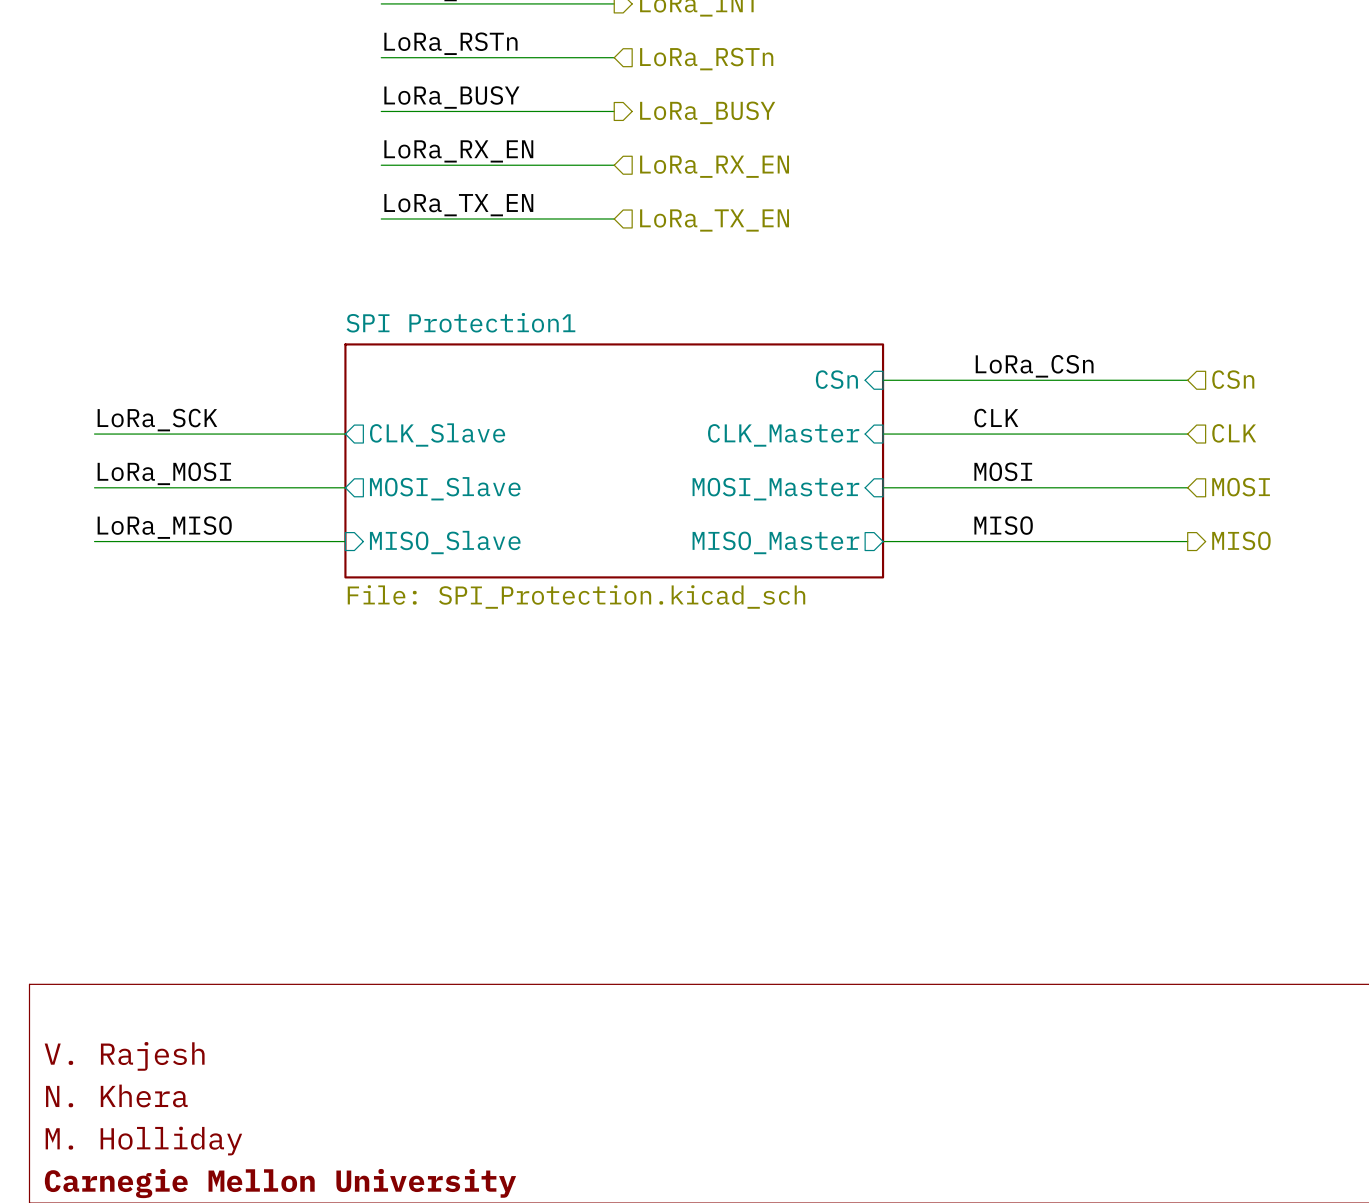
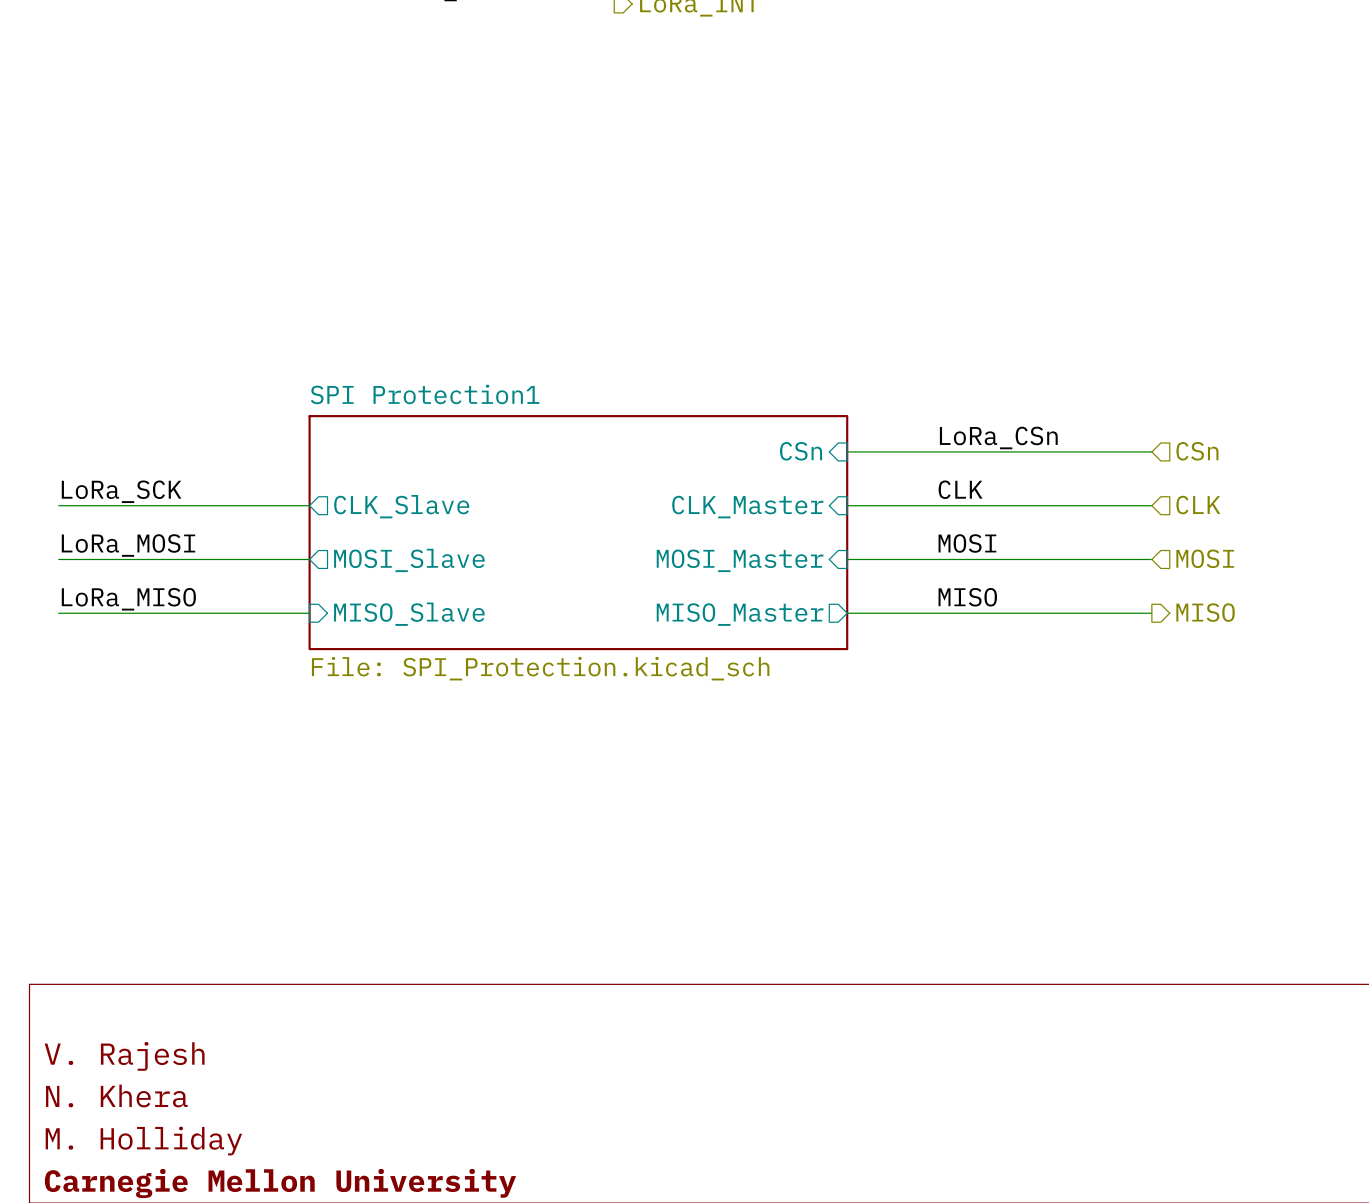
wire: (381, 3) (614, 3) -> none
label: LoRa_RSTn (450, 43) -> none
wire: (381, 57) (614, 57) -> none
hierarchical label: LoRa_RSTn (706, 59) -> none
label: LoRa_BUSY (451, 97) -> none
wire: (381, 111) (614, 111) -> none
hierarchical label: LoRa_BUSY (707, 112) -> none
label: LoRa_RX_EN (458, 151) -> none
wire: (381, 165) (614, 165) -> none
hierarchical label: LoRa_RX_EN (714, 166) -> none
label: LoRa_TX_EN (458, 205) -> none
wire: (381, 218) (614, 218) -> none
hierarchical label: LoRa_TX_EN (714, 220) -> none
label position: LoRa_CSn (1034, 366) -> LoRa_CSn (998, 437)
sheet pin position: CSn (836, 379) -> CSn (801, 451)
hierarchical label position: CSn (1233, 379) -> CSn (1197, 451)
wire: (883, 380) (1187, 380) -> (847, 451) (1151, 451)
label position: CLK (996, 418) -> CLK (960, 489)
label position: LoRa_SCK (157, 420) -> LoRa_SCK (121, 491)
hierarchical label position: CLK (1234, 433) -> CLK (1198, 505)
wire: (94, 434) (345, 434) -> (58, 505) (309, 505)
wire: (883, 434) (1187, 434) -> (847, 505) (1151, 505)
sheet pin position: CLK_Slave (437, 435) -> CLK_Slave (401, 506)
sheet pin position: CLK_Master (783, 435) -> CLK_Master (747, 507)
sheet SPI Protection1 position: (614, 460) -> (578, 532)
label position: MOSI (1003, 471) -> MOSI (967, 543)
label position: LoRa_MOSI (164, 473) -> LoRa_MOSI (128, 545)
wire: (94, 487) (345, 487) -> (58, 559) (309, 559)
wire: (883, 487) (1187, 487) -> (847, 559) (1151, 559)
hierarchical label position: MOSI (1241, 487) -> MOSI (1205, 558)
sheet pin position: MOSI_Slave (445, 488) -> MOSI_Slave (409, 560)
sheet pin position: MOSI_Master (775, 489) -> MOSI_Master (740, 560)
label position: MISO (1003, 525) -> MISO (967, 597)
label position: LoRa_MISO (164, 527) -> LoRa_MISO (128, 599)
hierarchical label position: MISO (1241, 540) -> MISO (1205, 612)
wire: (94, 541) (345, 541) -> (58, 613) (309, 613)
wire: (883, 541) (1187, 541) -> (847, 613) (1151, 613)
sheet pin position: MISO_Slave (445, 542) -> MISO_Slave (409, 614)
sheet pin position: MISO_Master (775, 542) -> MISO_Master (740, 614)

